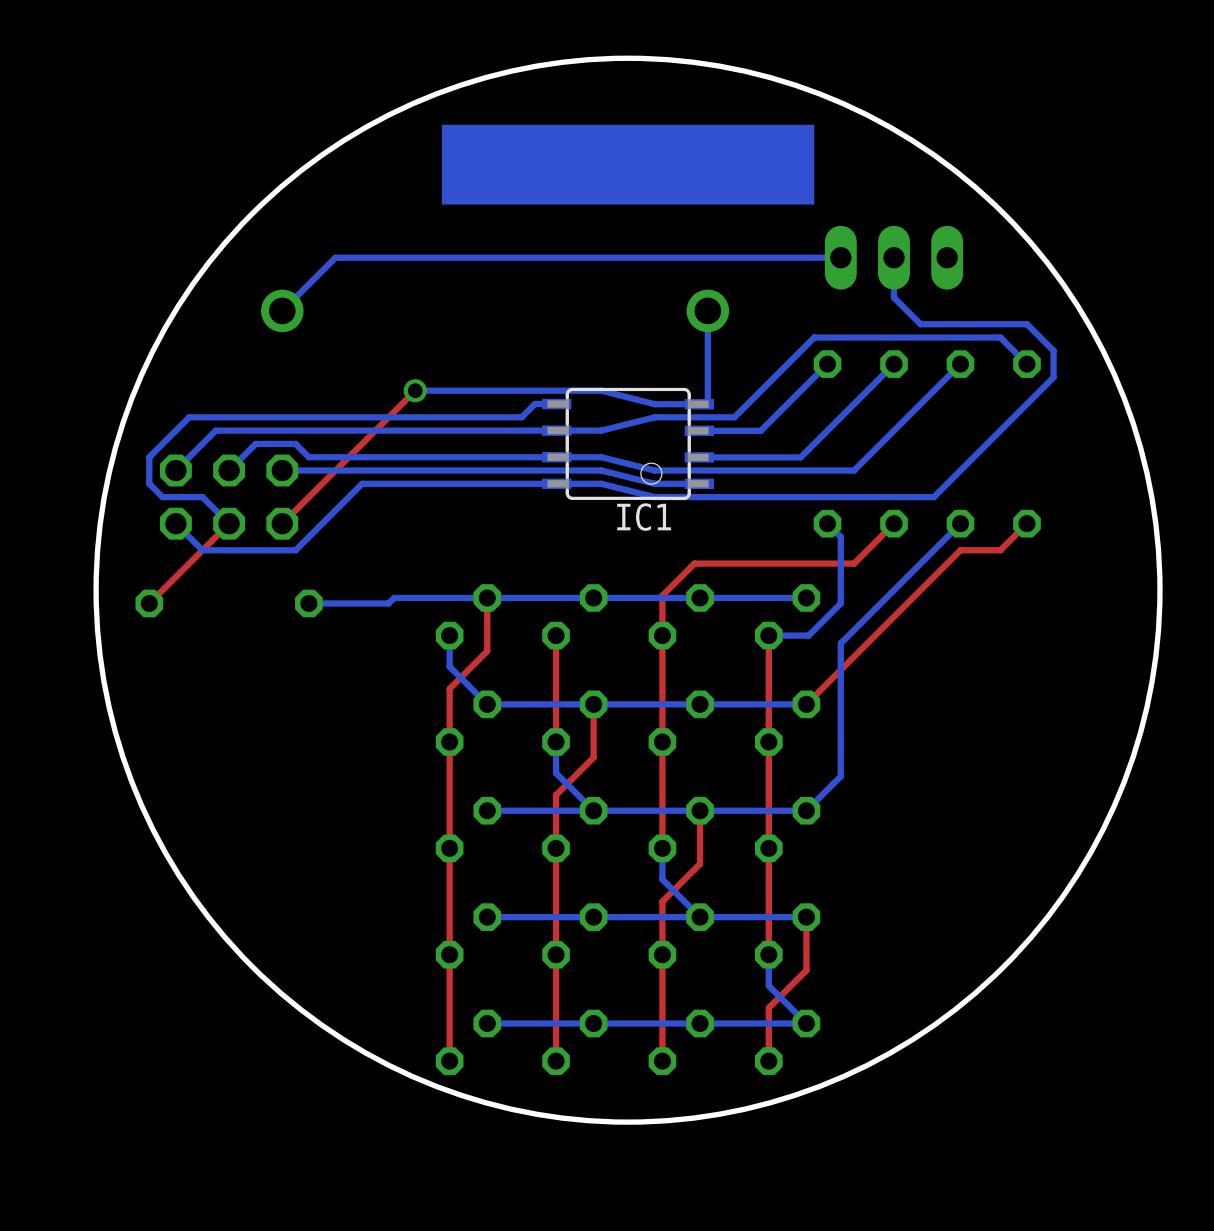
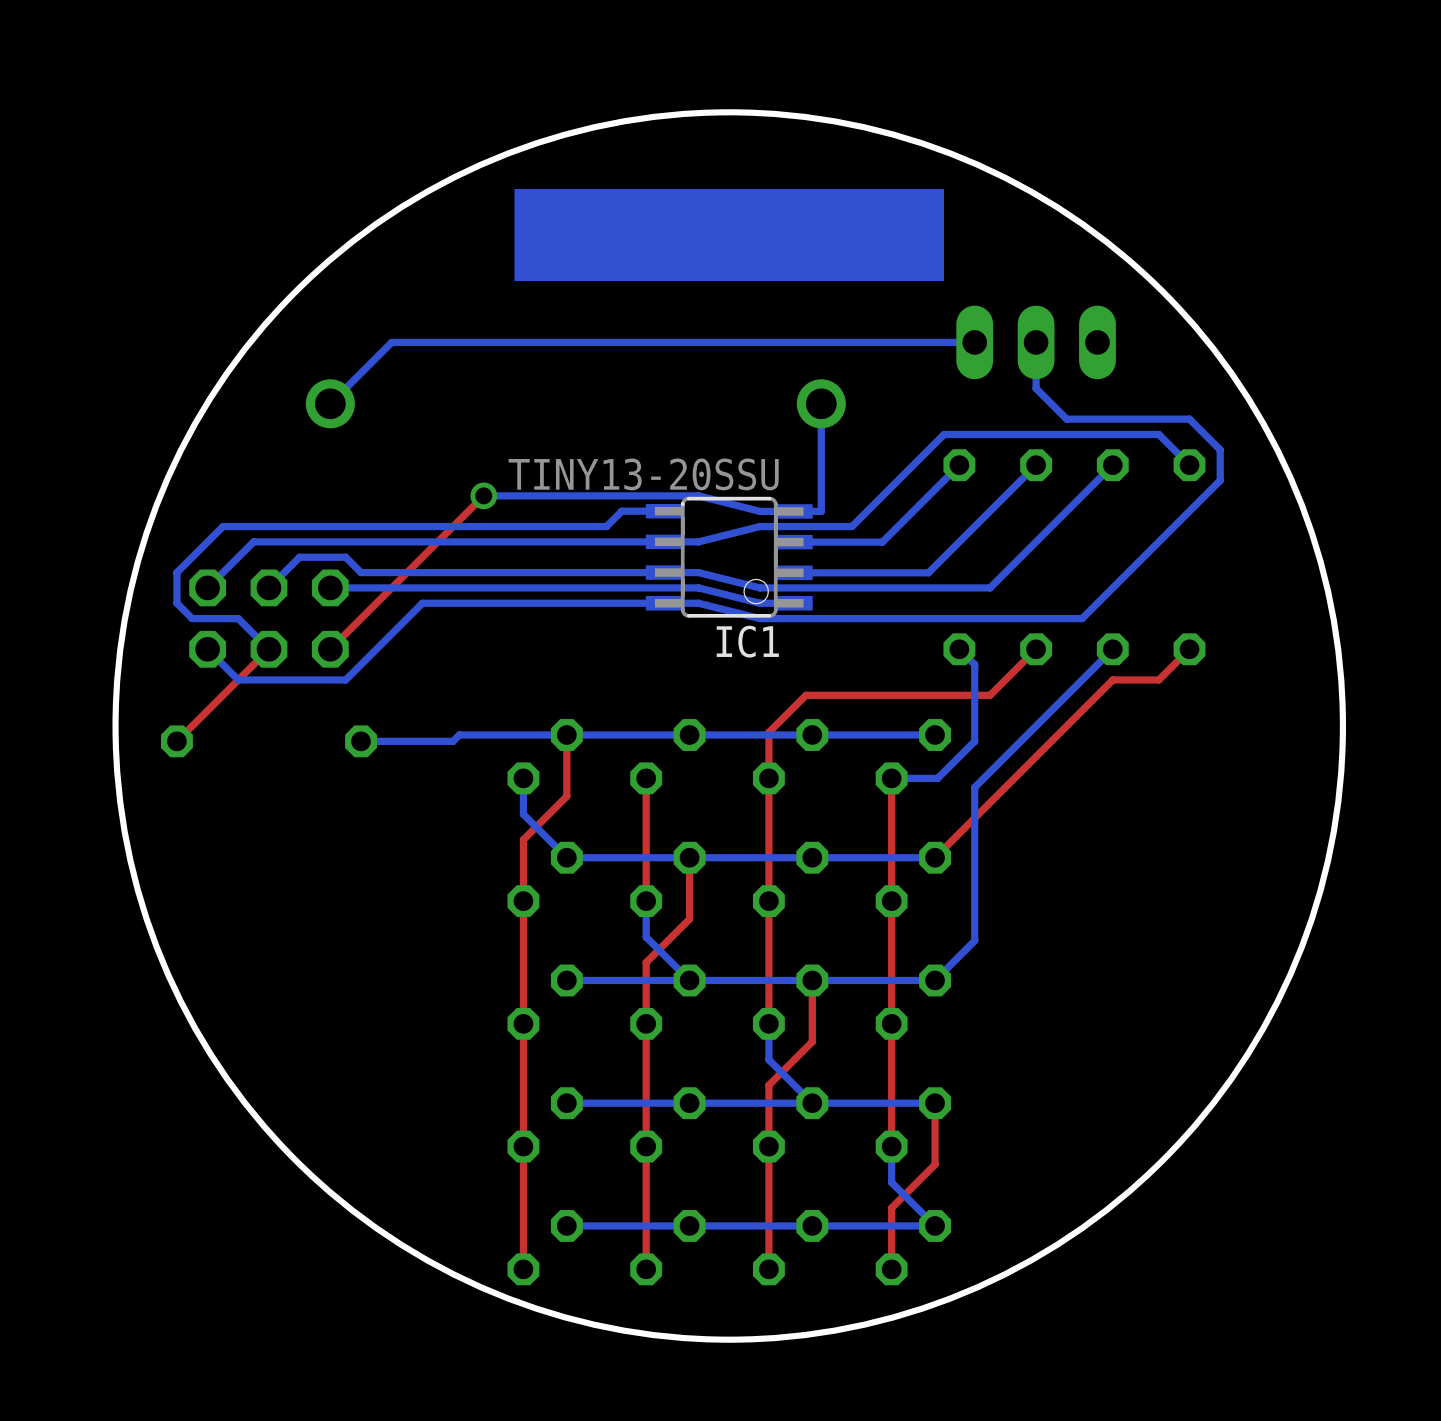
IC1 value: none -> TINY13-20SSU (643, 474)
IC1 footprint: [542, 387, 714, 500] -> [645, 496, 813, 618]

